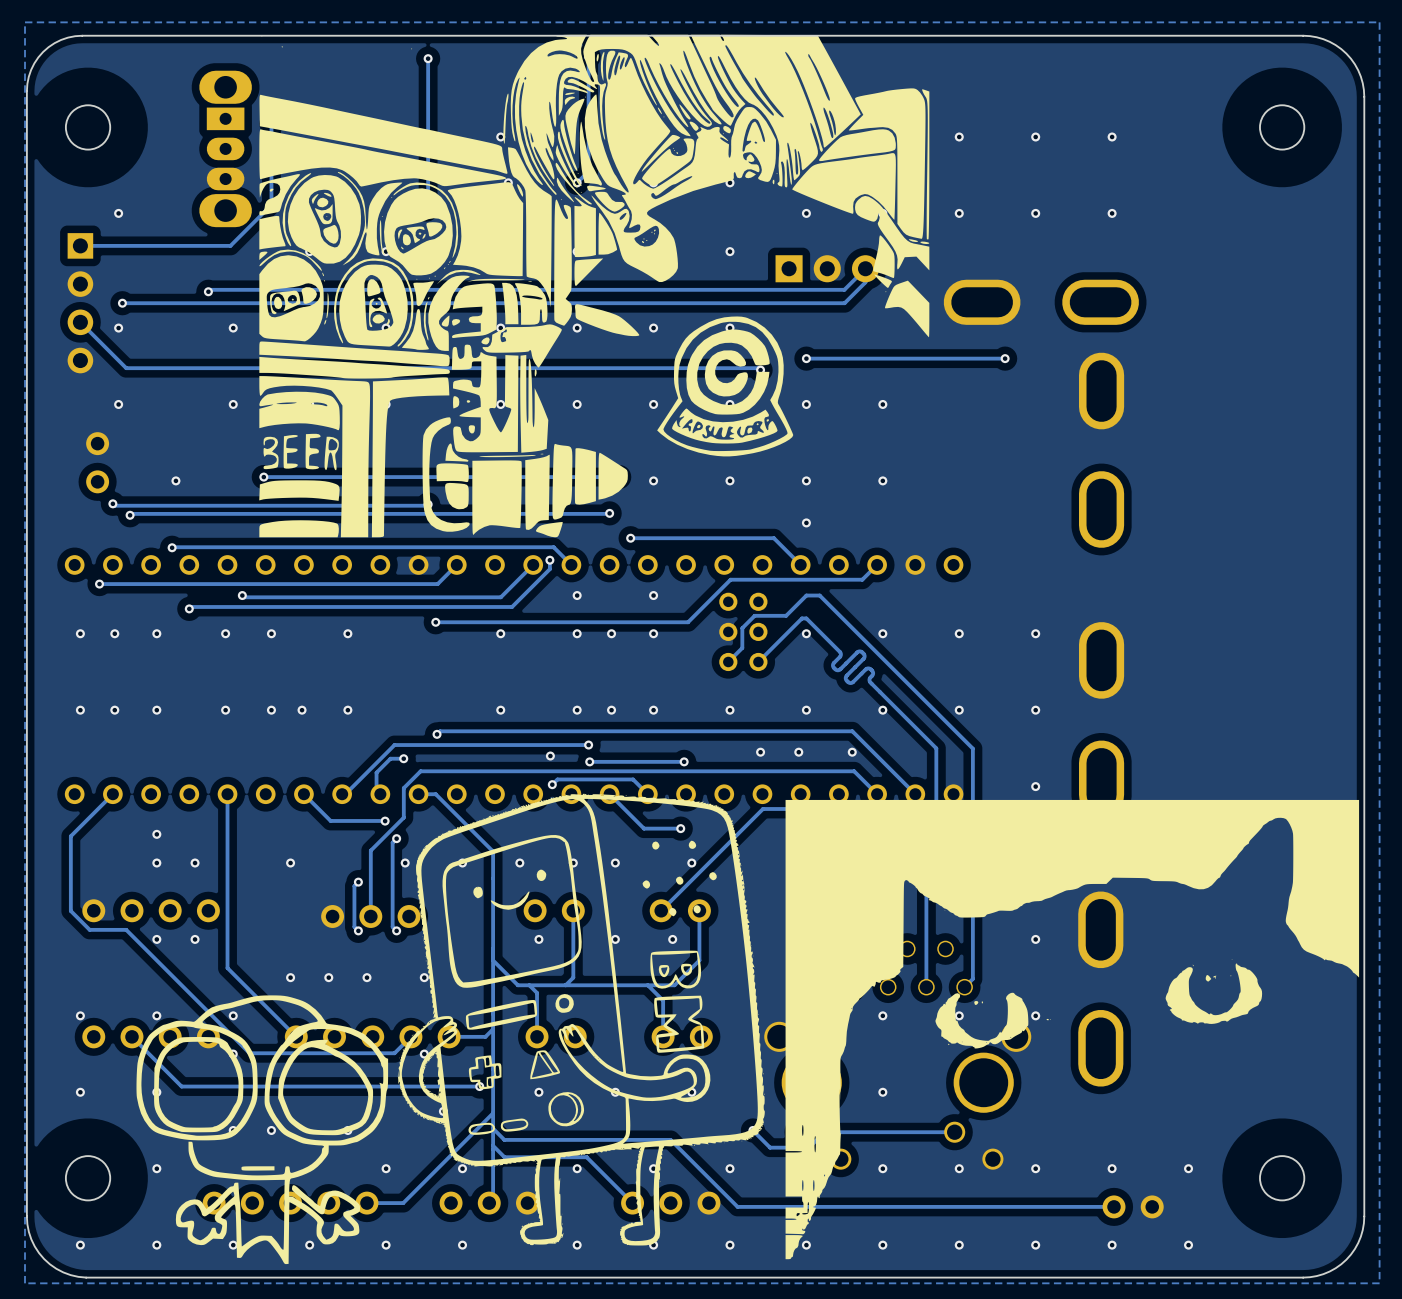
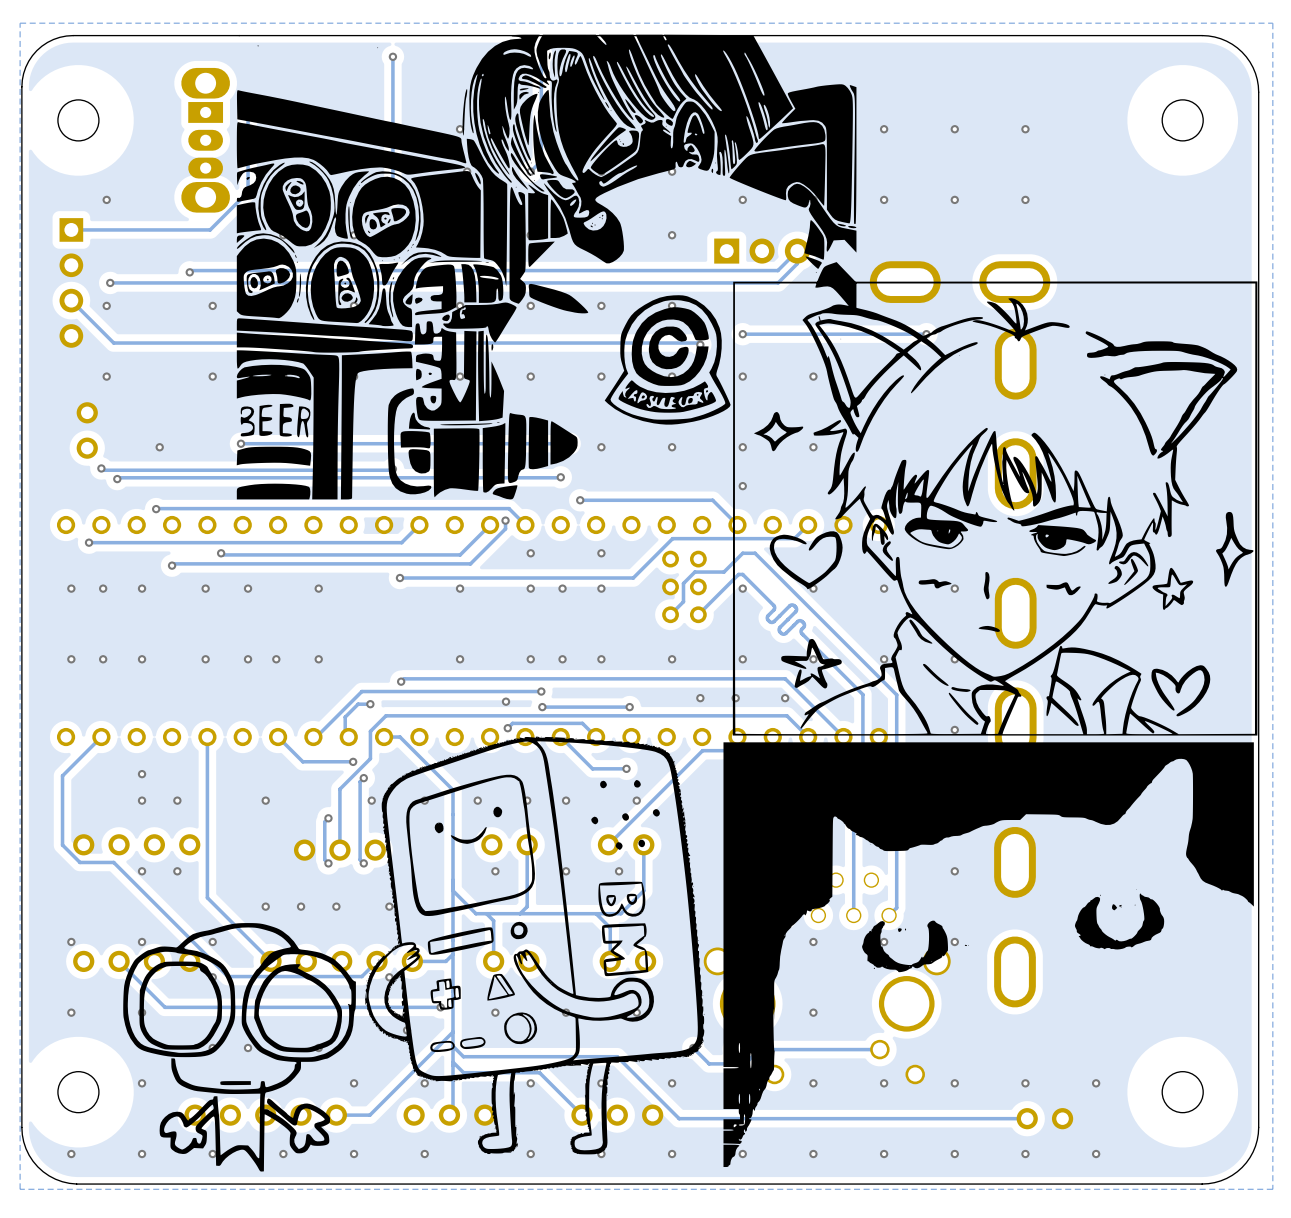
part: none -> (995, 508)

